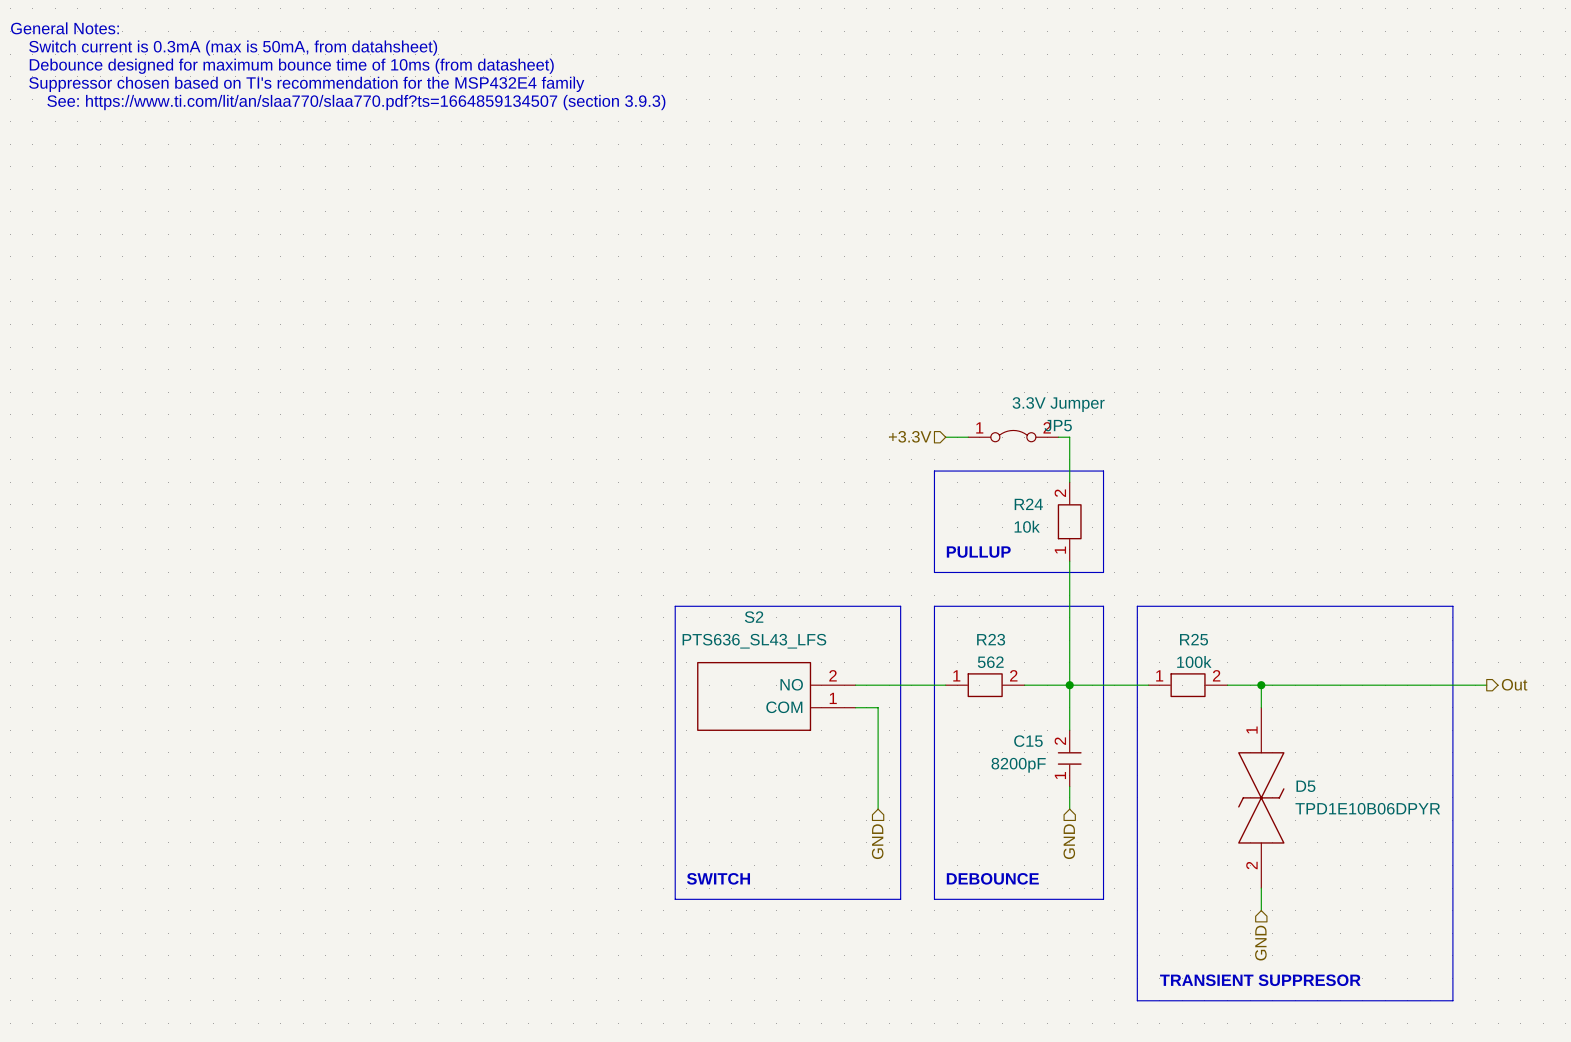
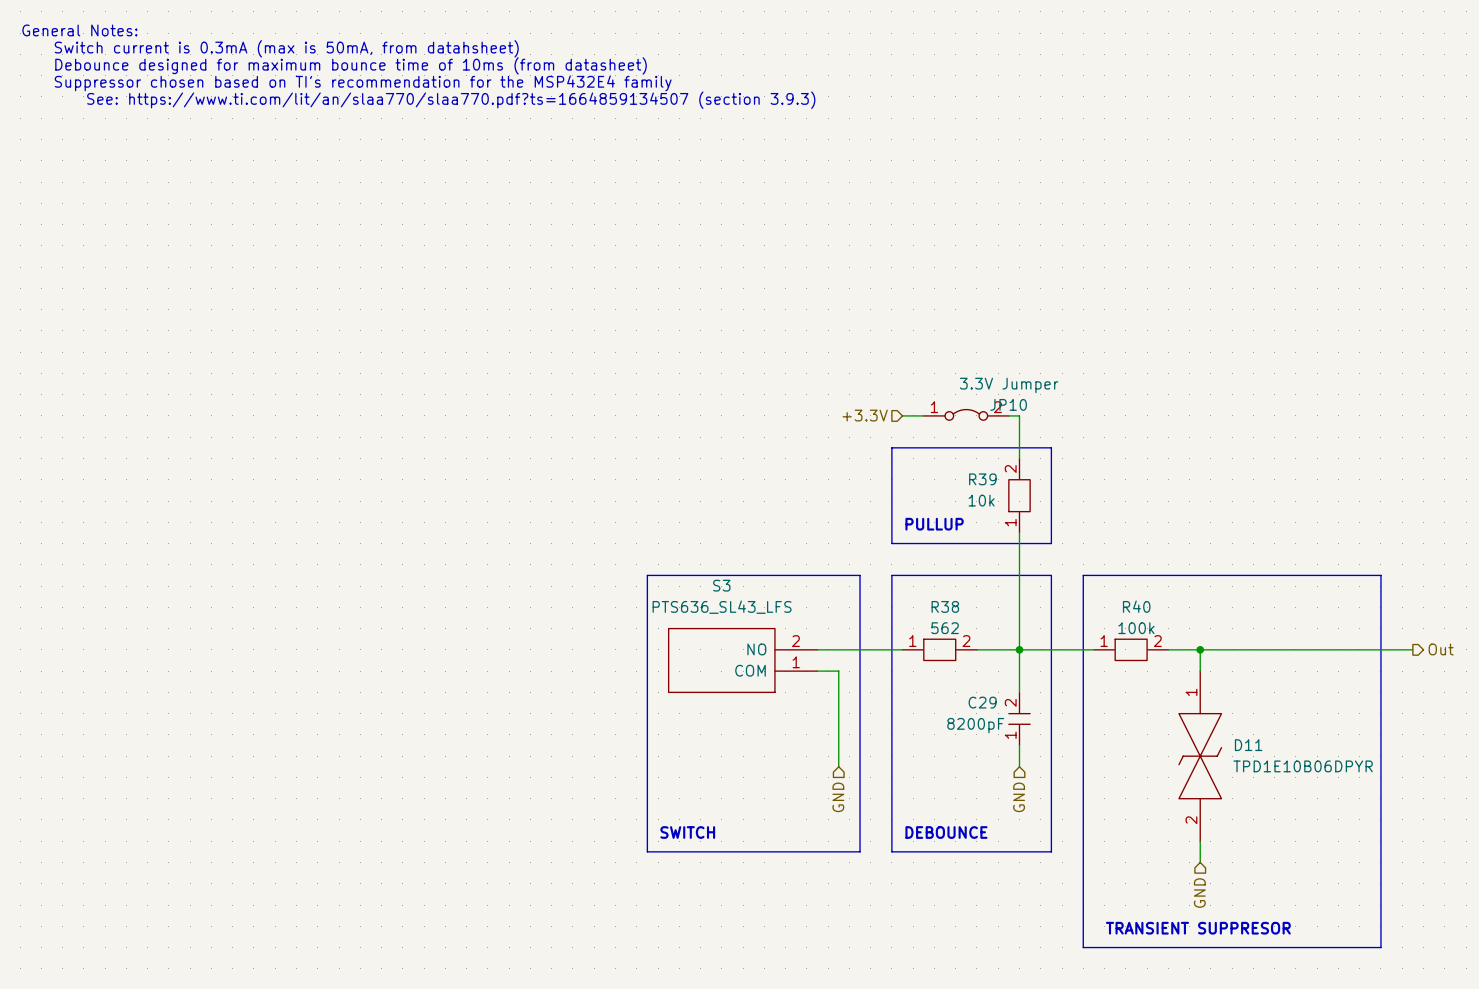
JP5 name: JP5 (1058, 425) -> JP10 (1008, 404)
R24 name: R24 (1028, 504) -> R39 (982, 479)
S2 name: S2 (754, 617) -> S3 (721, 585)
R23 name: R23 (991, 639) -> R38 (945, 606)
R25 name: R25 (1194, 639) -> R40 (1136, 606)
C15 name: C15 (1028, 741) -> C29 (982, 702)
D5 name: D5 (1305, 786) -> D11 (1248, 745)

